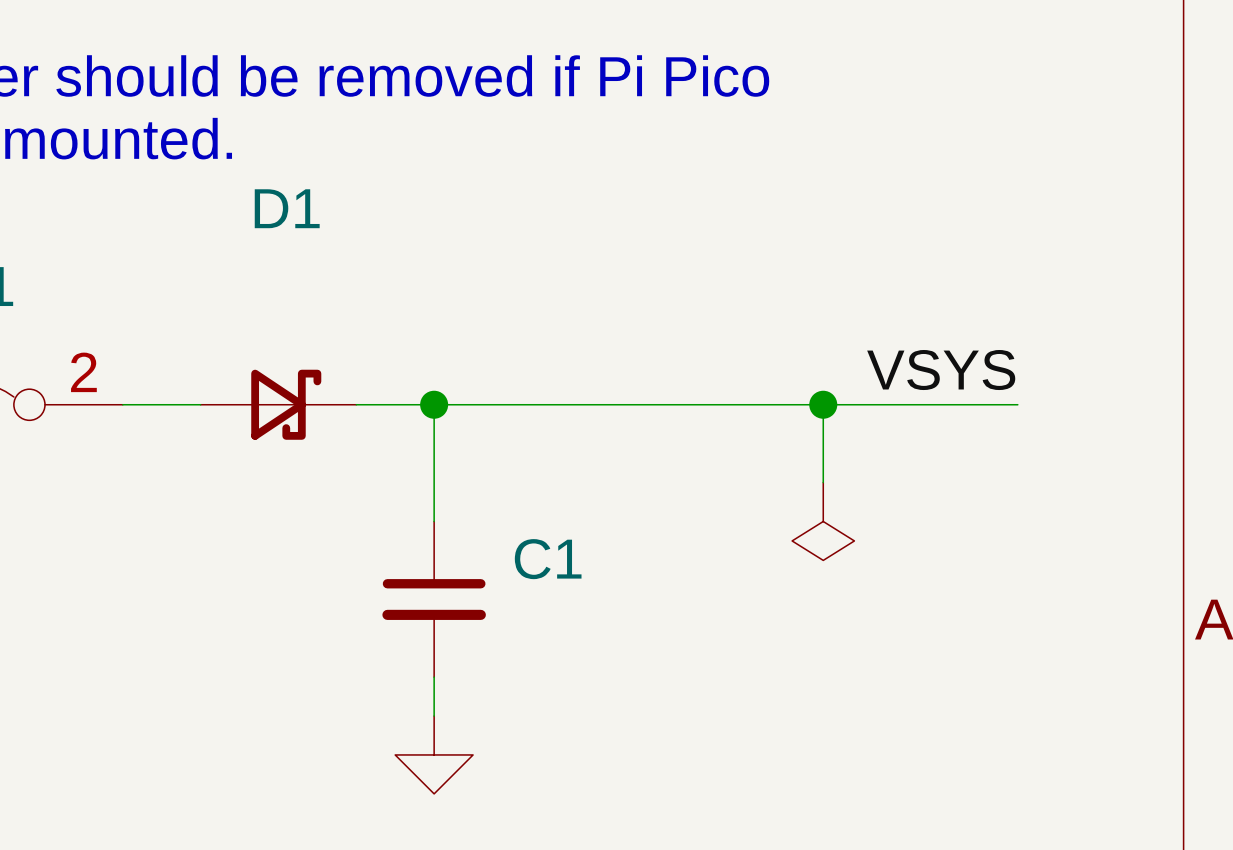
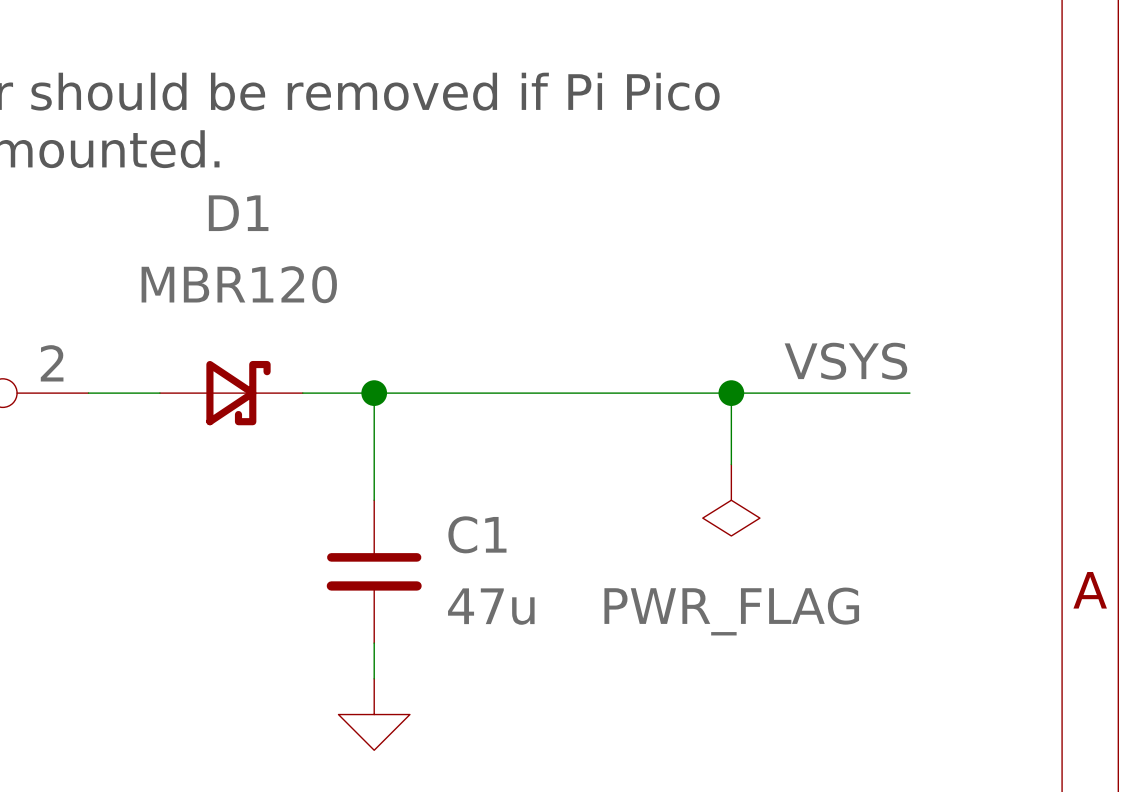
D1 value: none -> MBR120 (239, 284)
C1 value: none -> 47u (491, 606)
power symbol text: none -> PWR_FLAG (731, 611)

